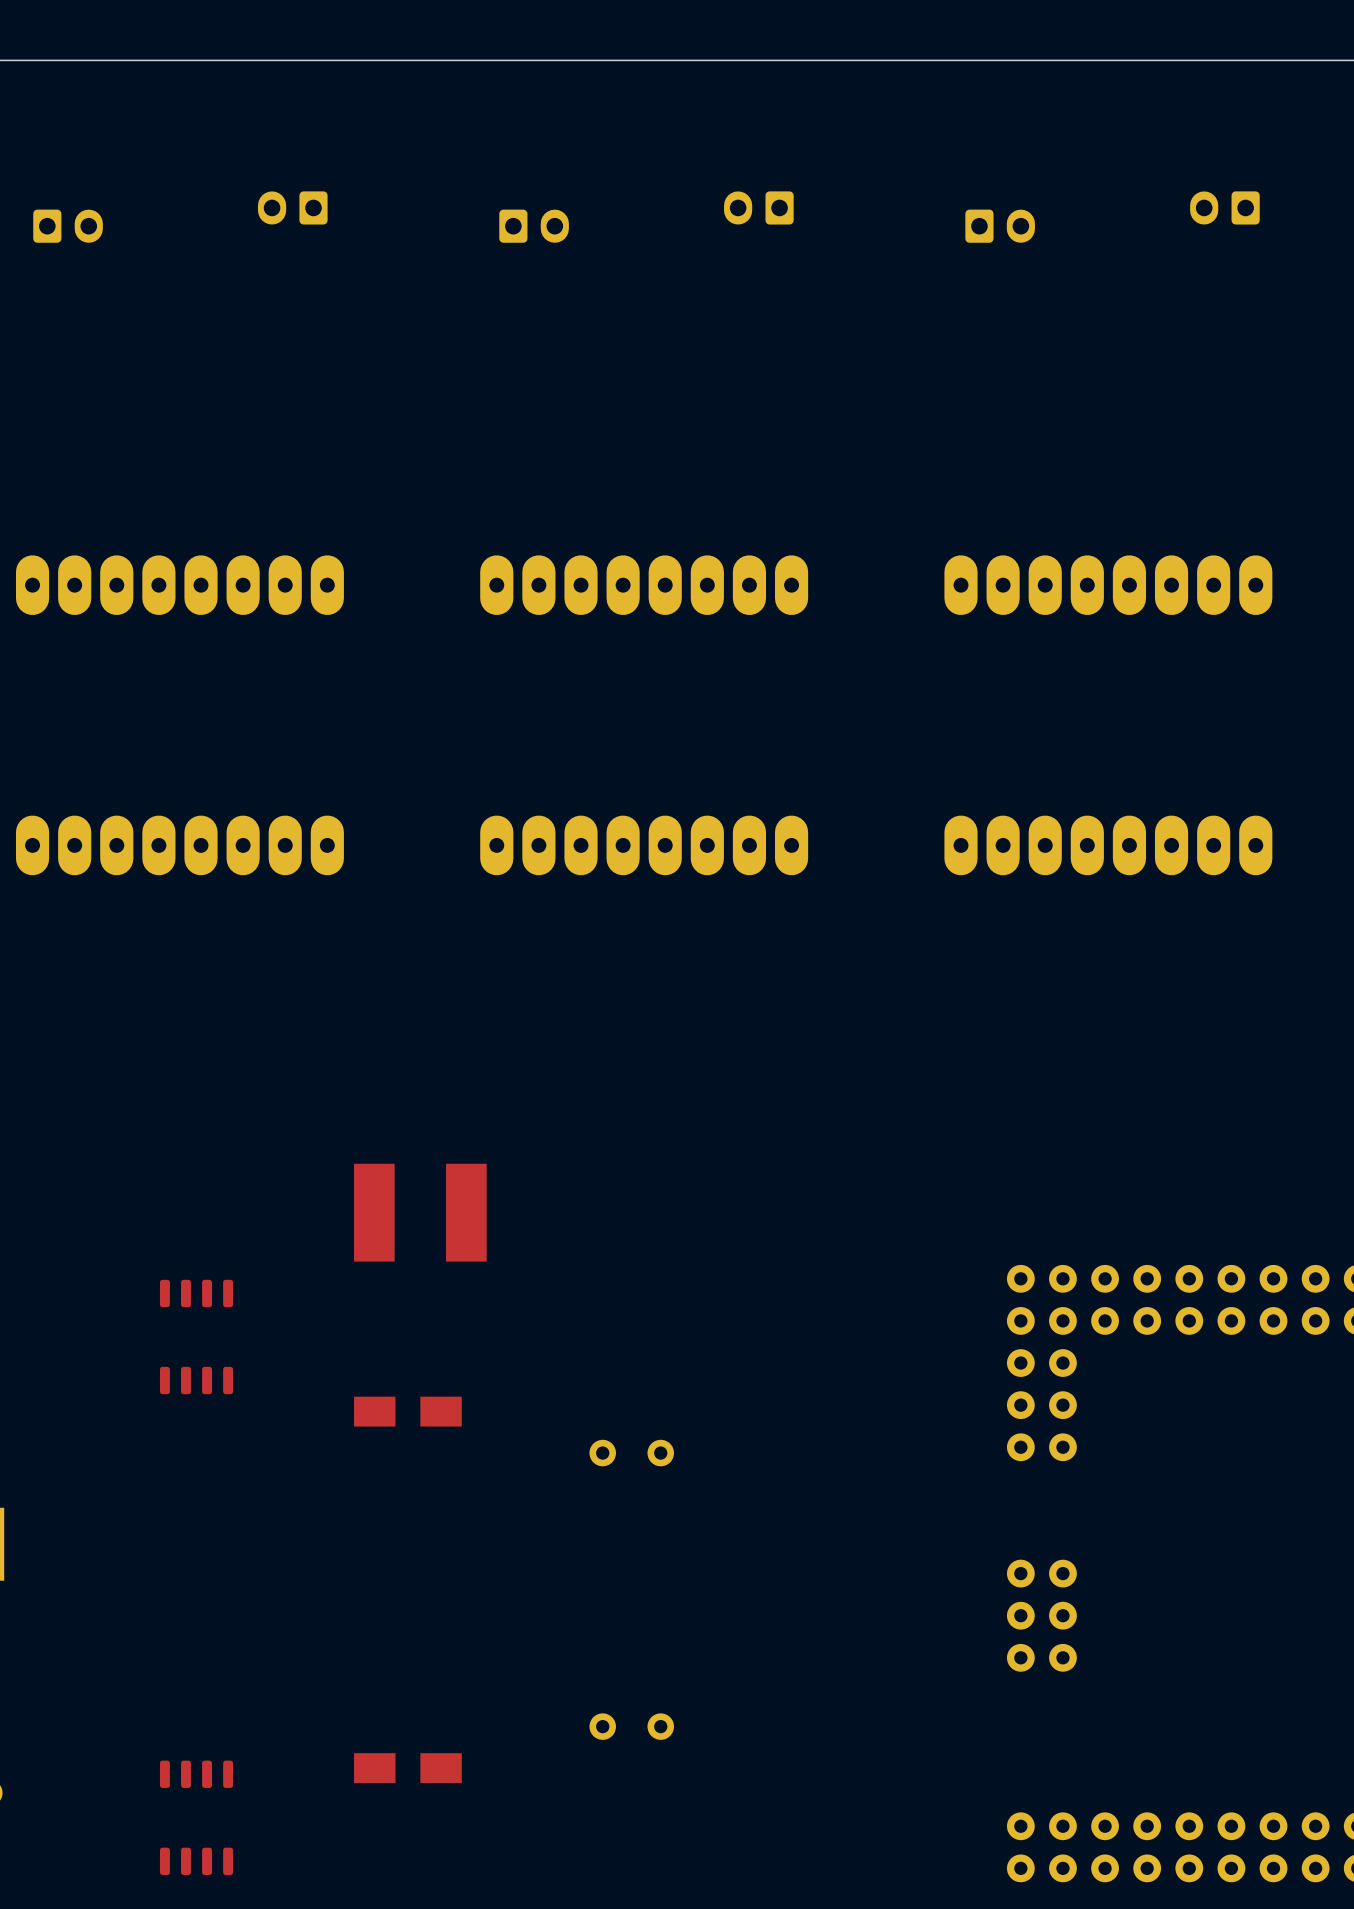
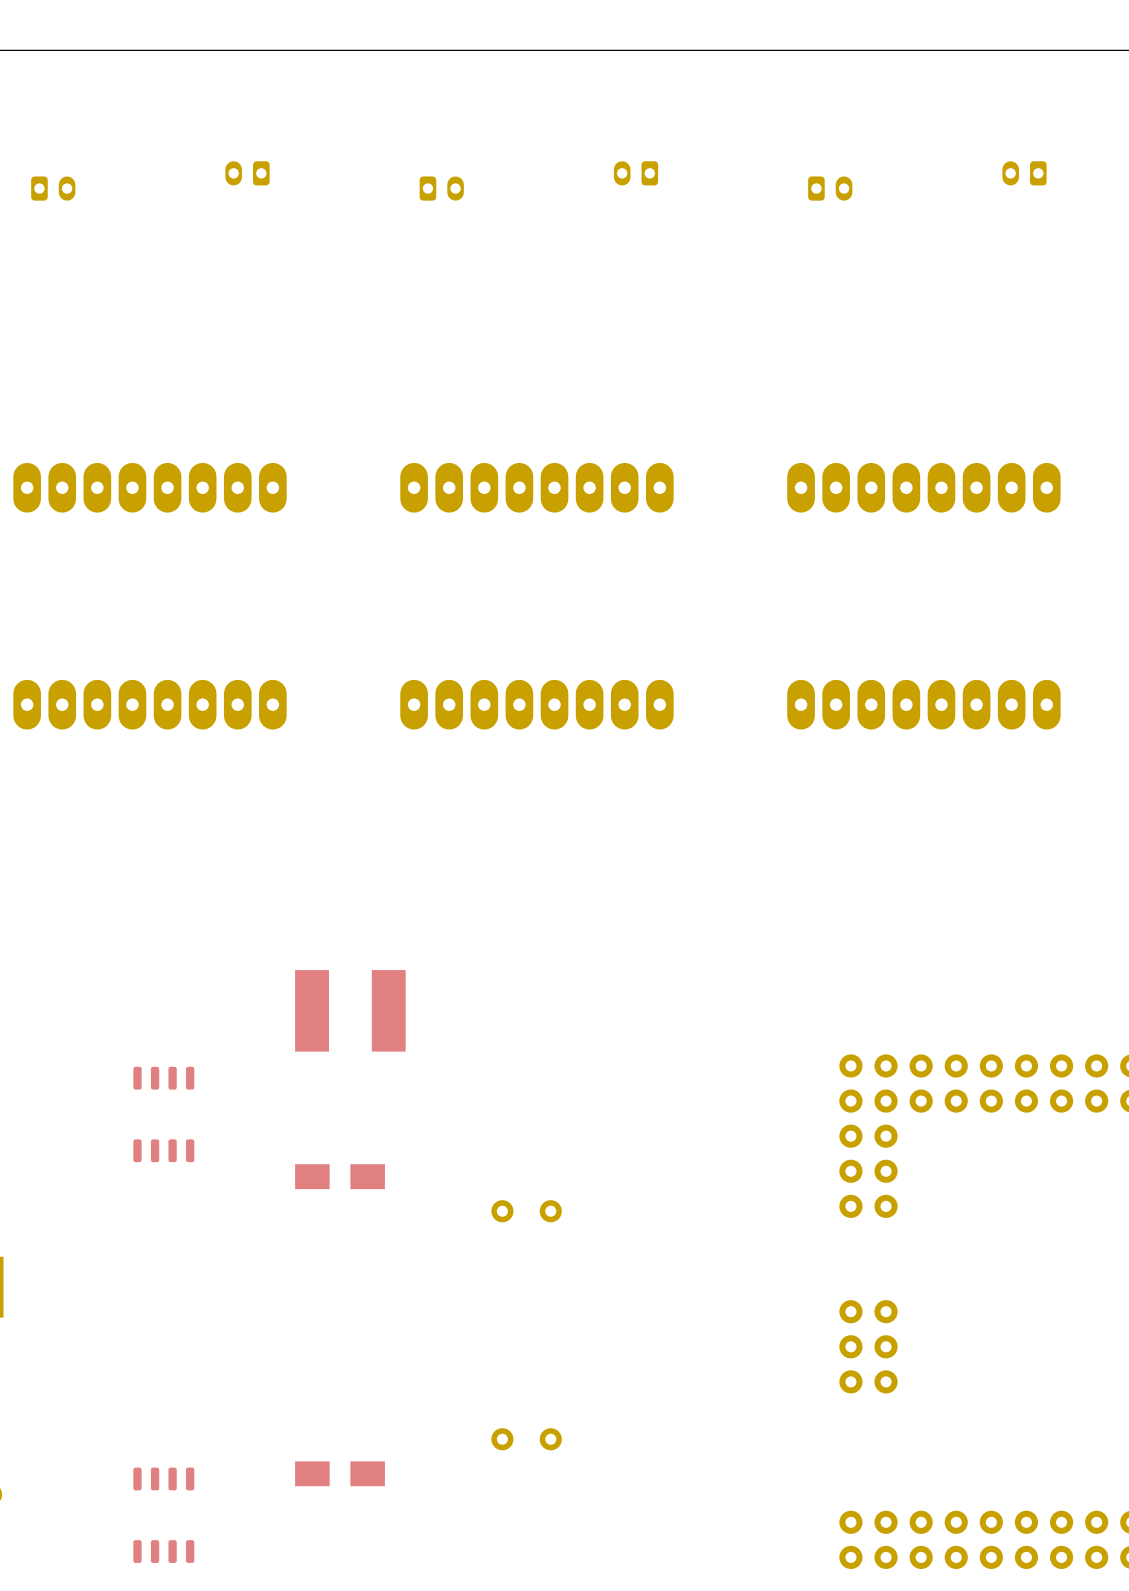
part footprint: [257, 191, 328, 225] -> [225, 161, 270, 186]
part footprint: [724, 191, 794, 225] -> [613, 161, 659, 186]
part footprint: [1190, 191, 1260, 225] -> [1002, 161, 1047, 186]
part footprint: [33, 209, 103, 243] -> [31, 176, 76, 201]
part footprint: [499, 209, 569, 243] -> [419, 176, 464, 201]
part footprint: [965, 209, 1035, 243] -> [808, 176, 853, 201]

